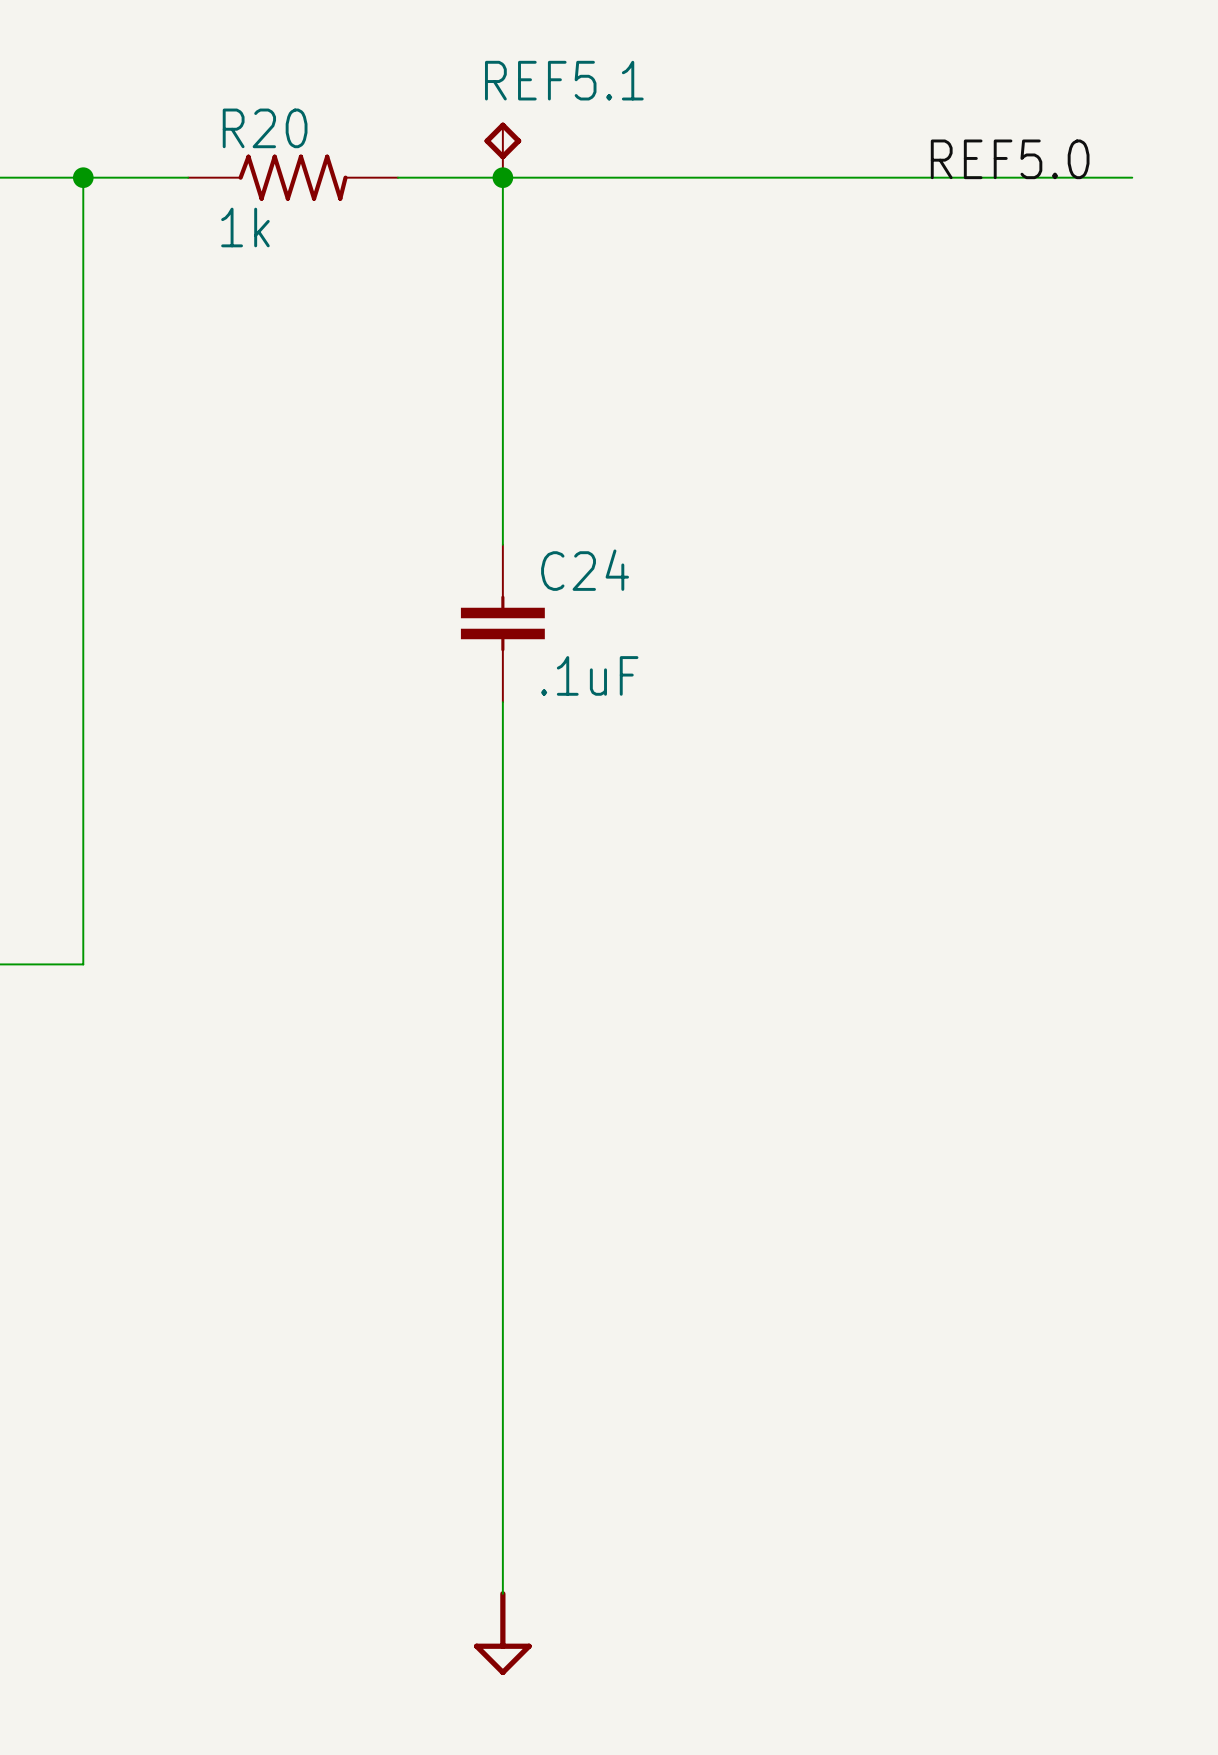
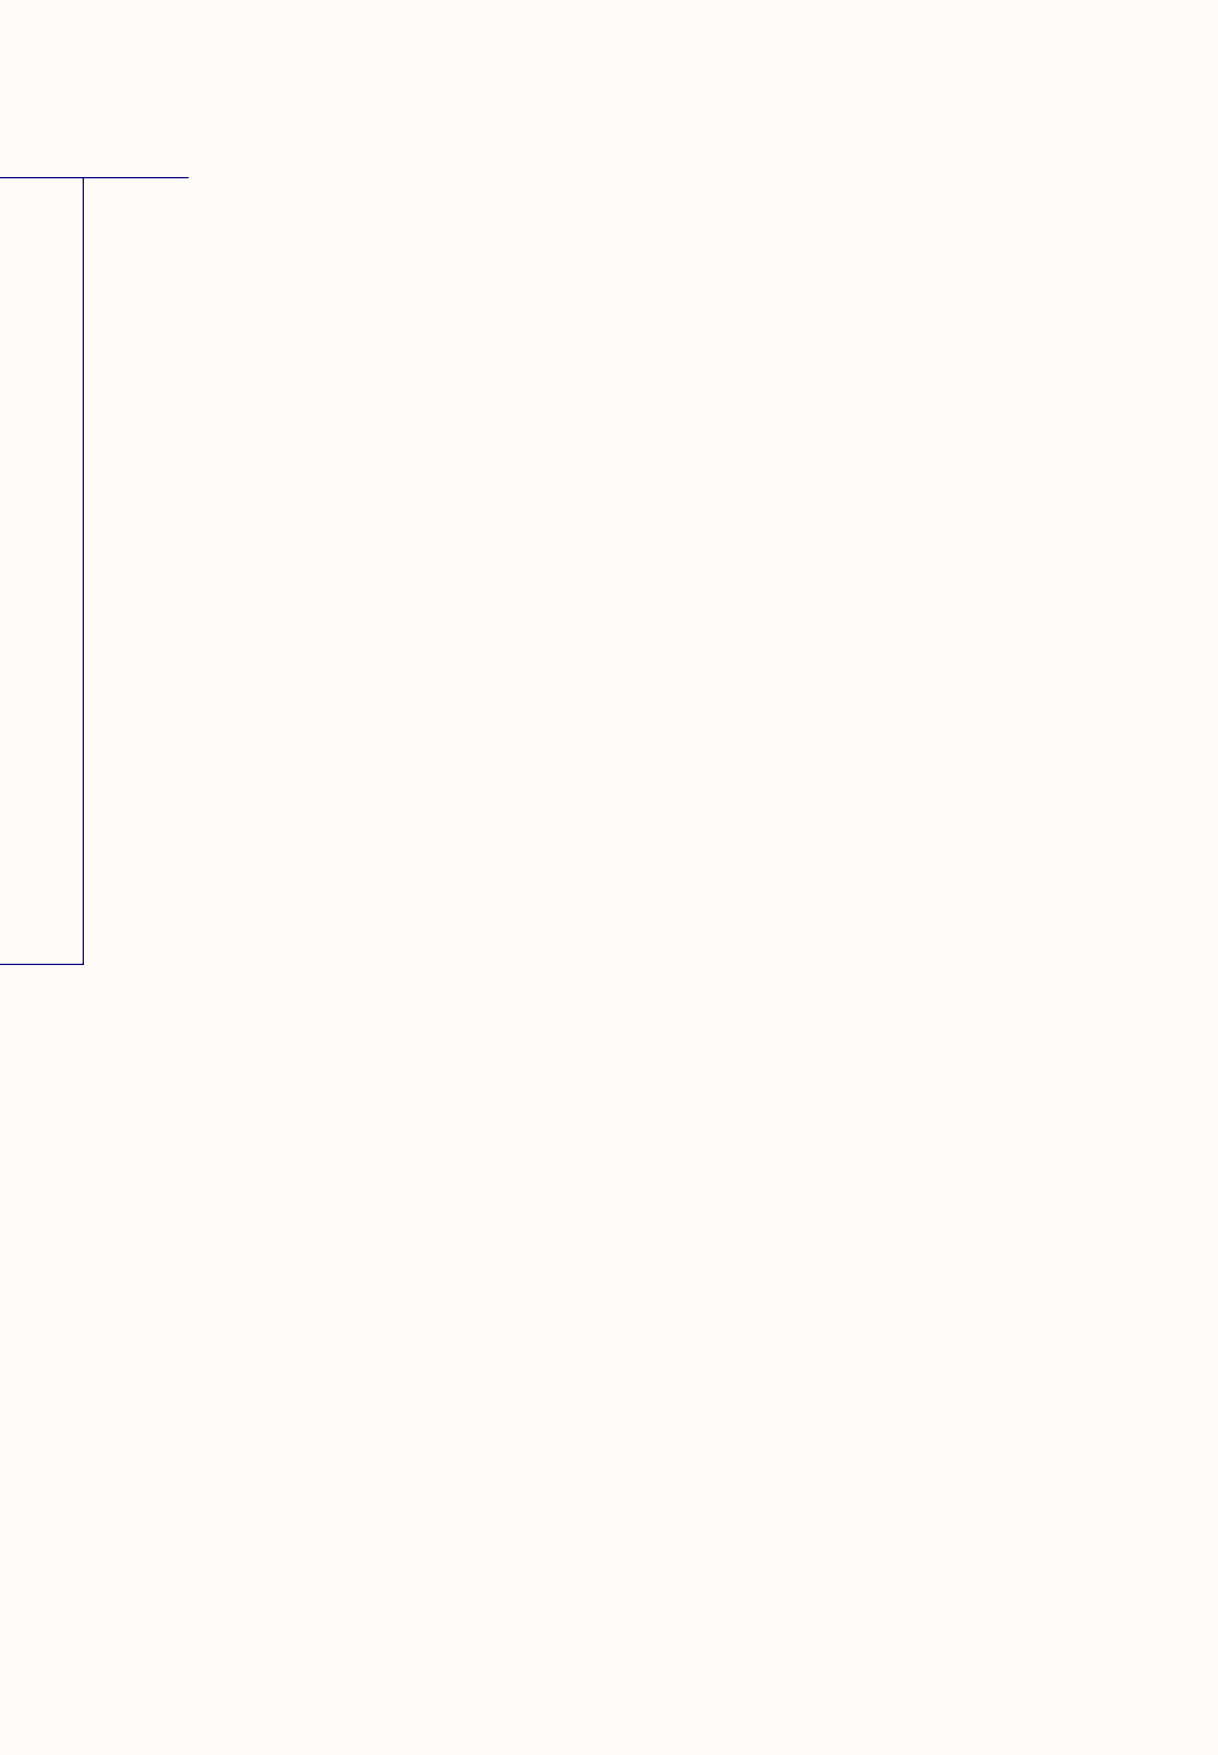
REF5.1: (502, 150) -> none
label: REF5.0 (1010, 159) -> none
junction: (83, 177) -> none
R20: 1k (293, 177) -> none
wire: (397, 177) (1132, 177) -> none
wire: (502, 177) (502, 544) -> none
junction: (502, 177) -> none
C24: .1uF (502, 623) -> none
wire: (502, 702) (502, 1593) -> none
part: (502, 1633) -> none

